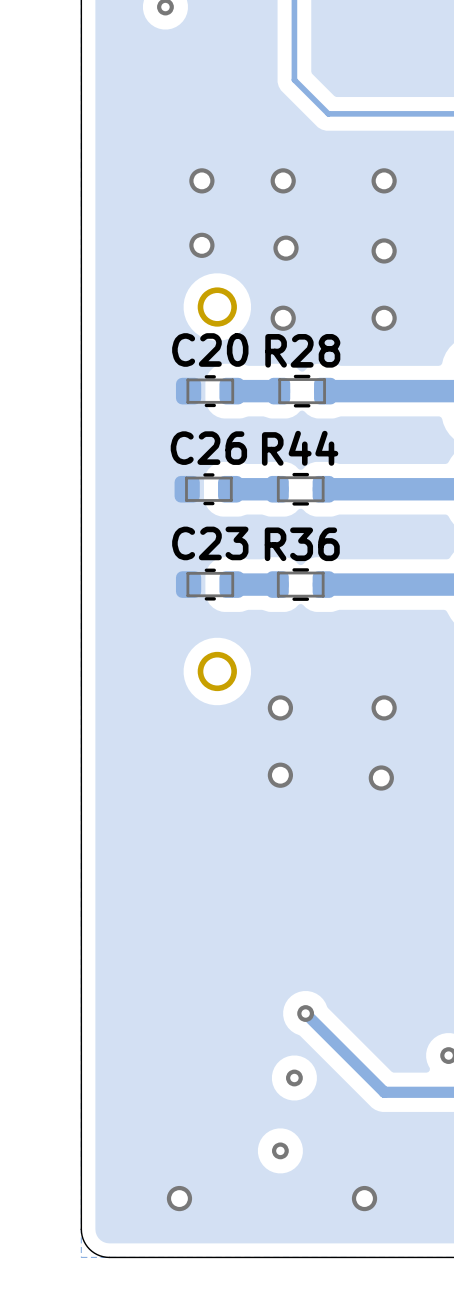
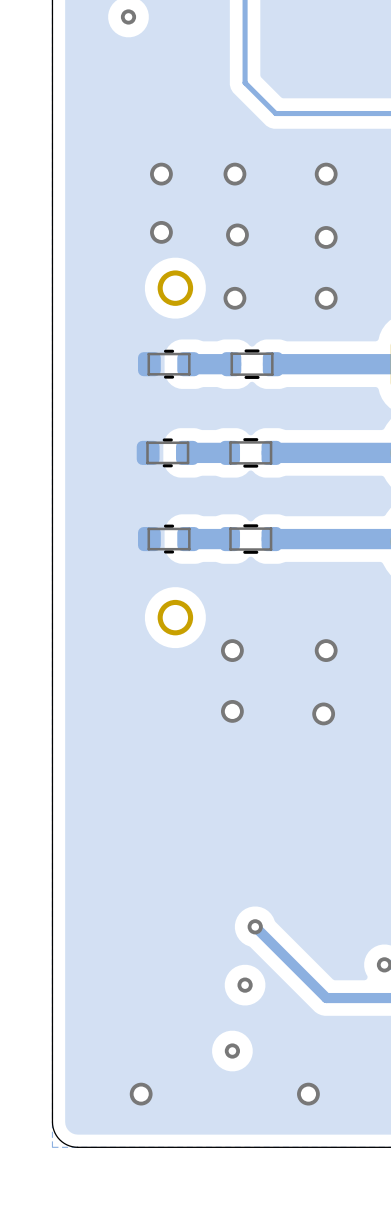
C20 name: C20 (210, 349) -> none
R28 name: R28 (302, 350) -> none
C26 name: C26 (208, 448) -> none
R44 name: R44 (300, 448) -> none
C23 name: C23 (210, 543) -> none
R36 name: R36 (302, 544) -> none

